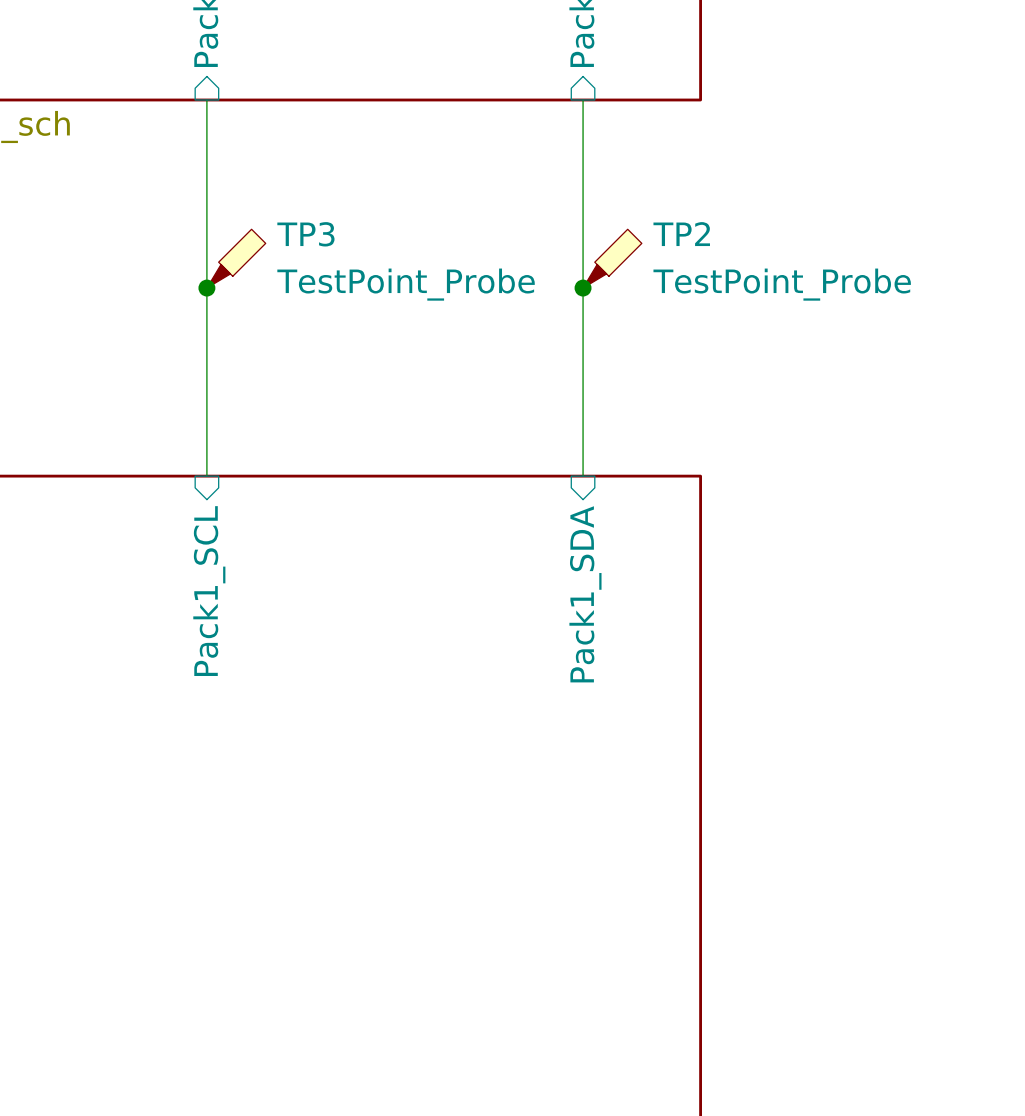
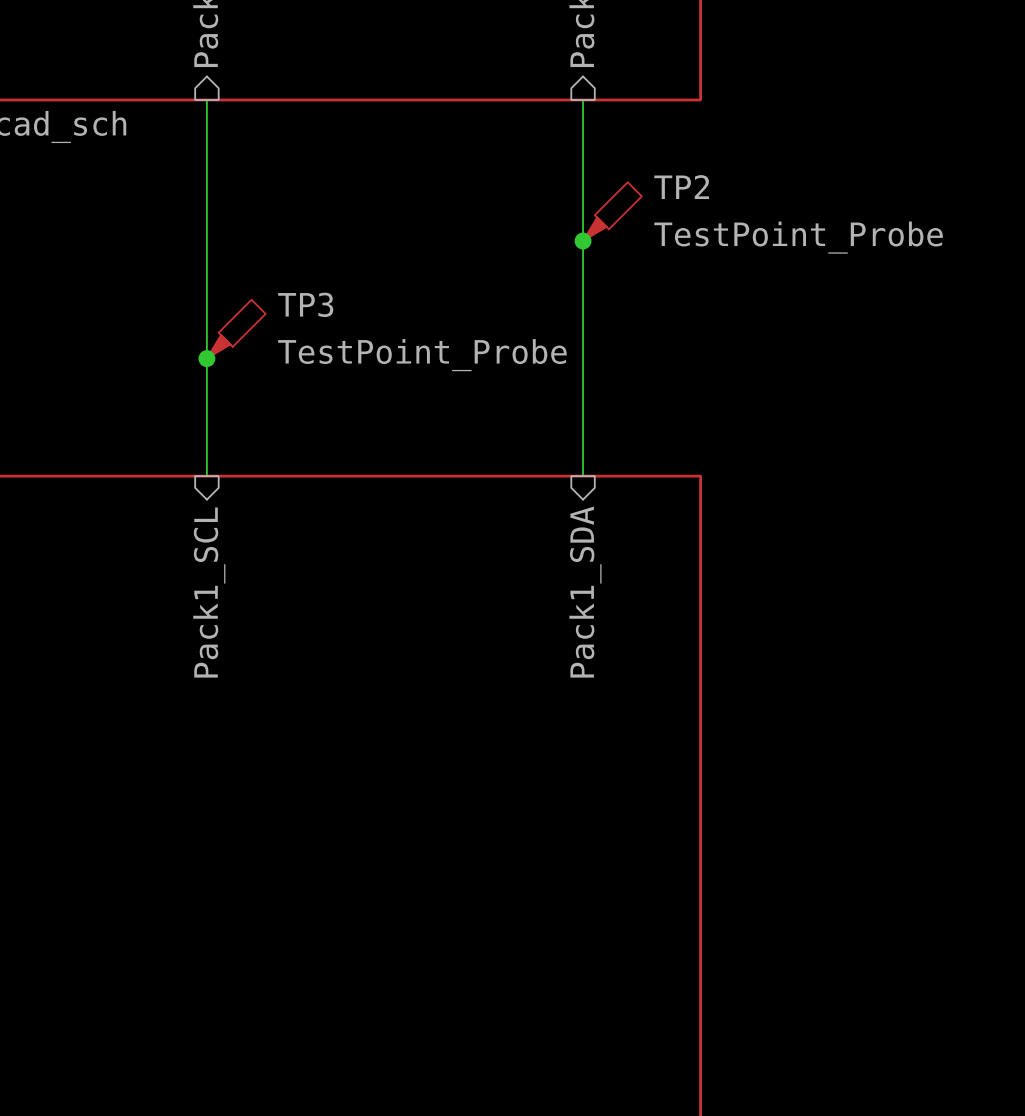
TP3 position: (236, 258) -> (236, 329)
TP2 position: (612, 258) -> (612, 211)
junction position: (206, 288) -> (206, 358)
junction position: (583, 288) -> (583, 241)

